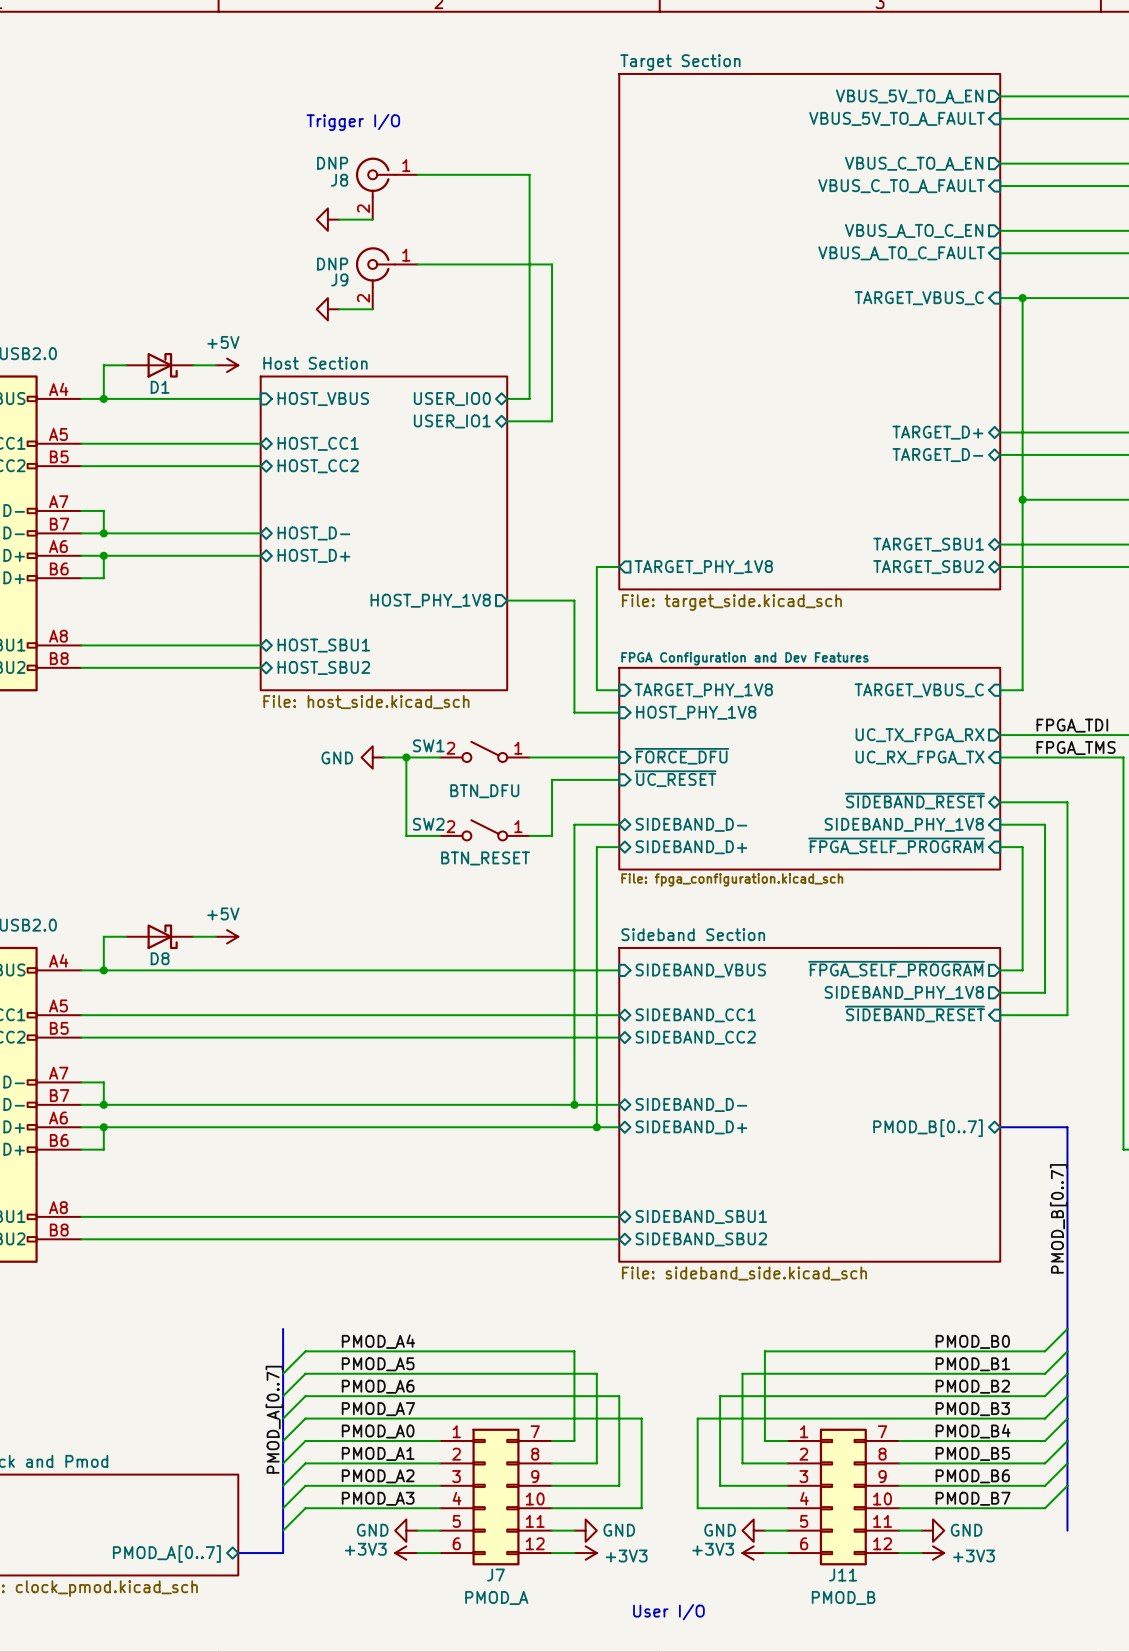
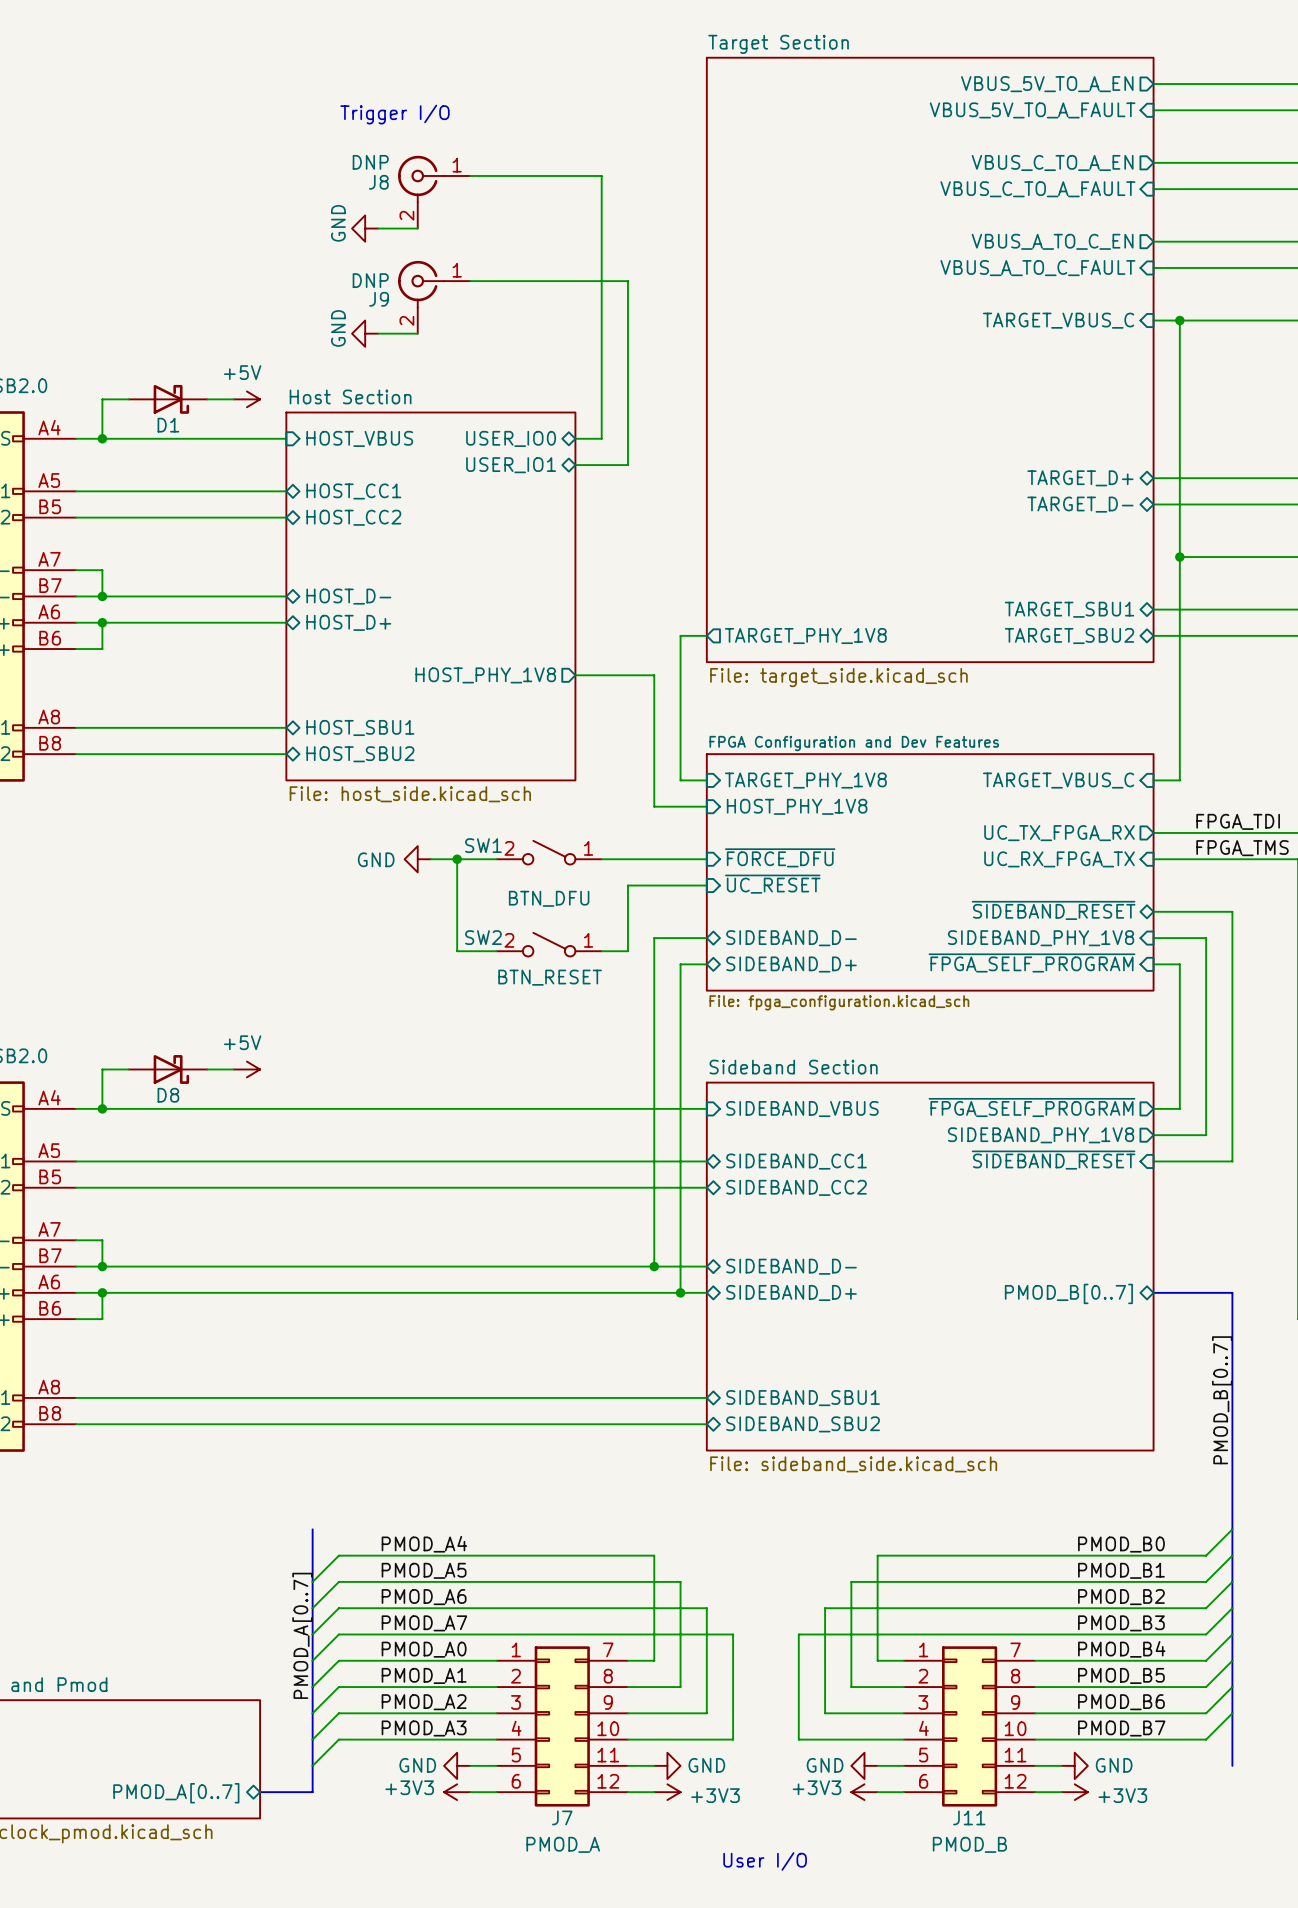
power symbol text: none -> GND (338, 223)
power symbol text: none -> GND (338, 328)

